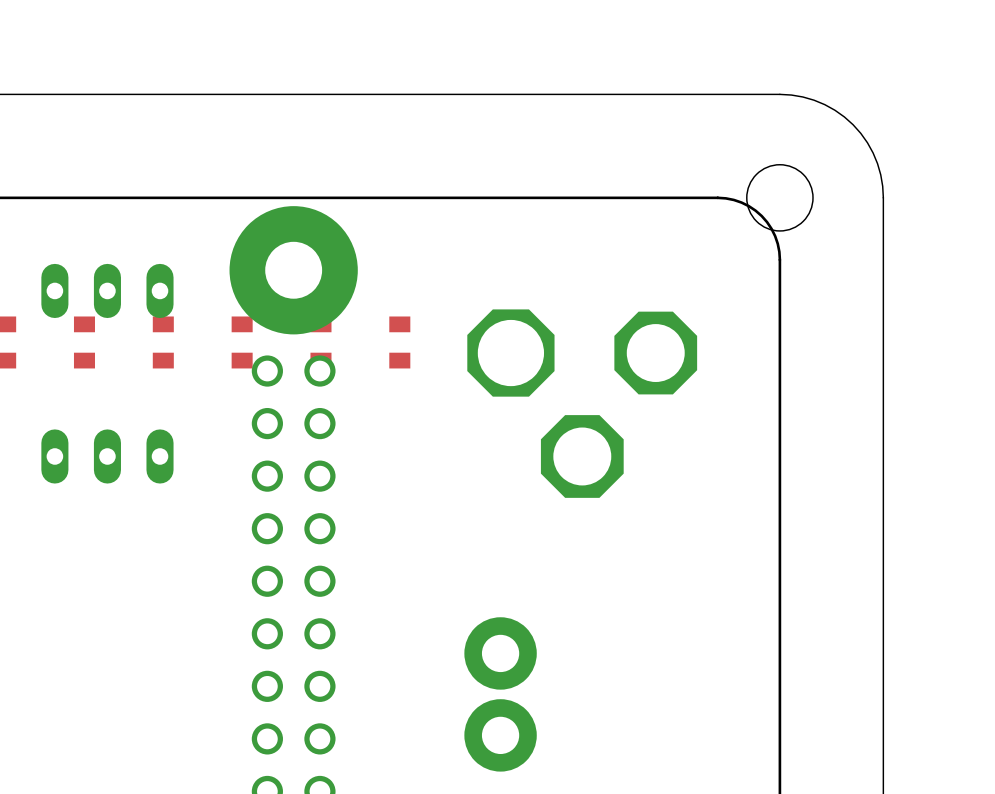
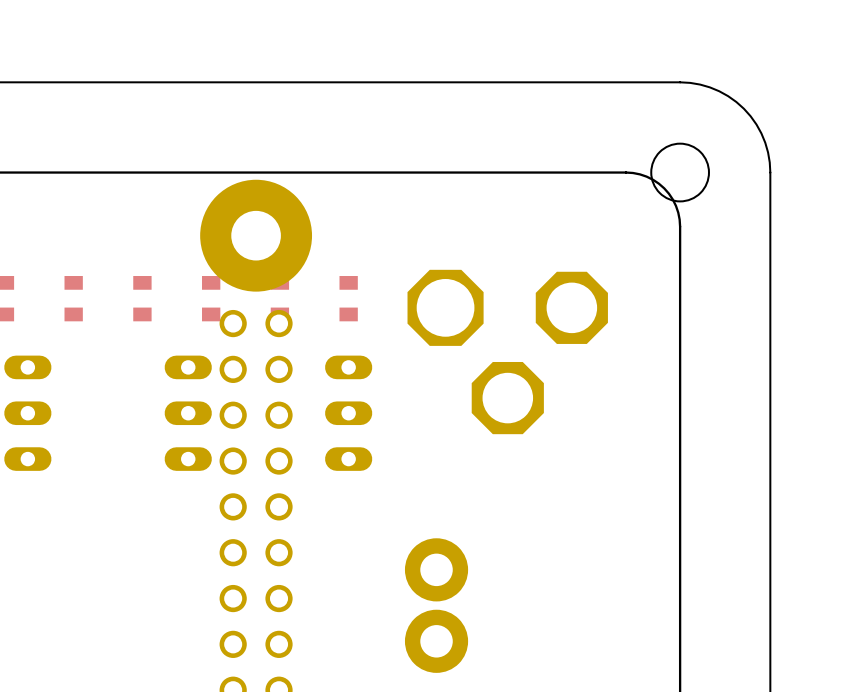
part: (107, 290) -> none
part: (107, 456) -> none
part: none -> (27, 413)
part: none -> (188, 413)
part: none -> (348, 413)

